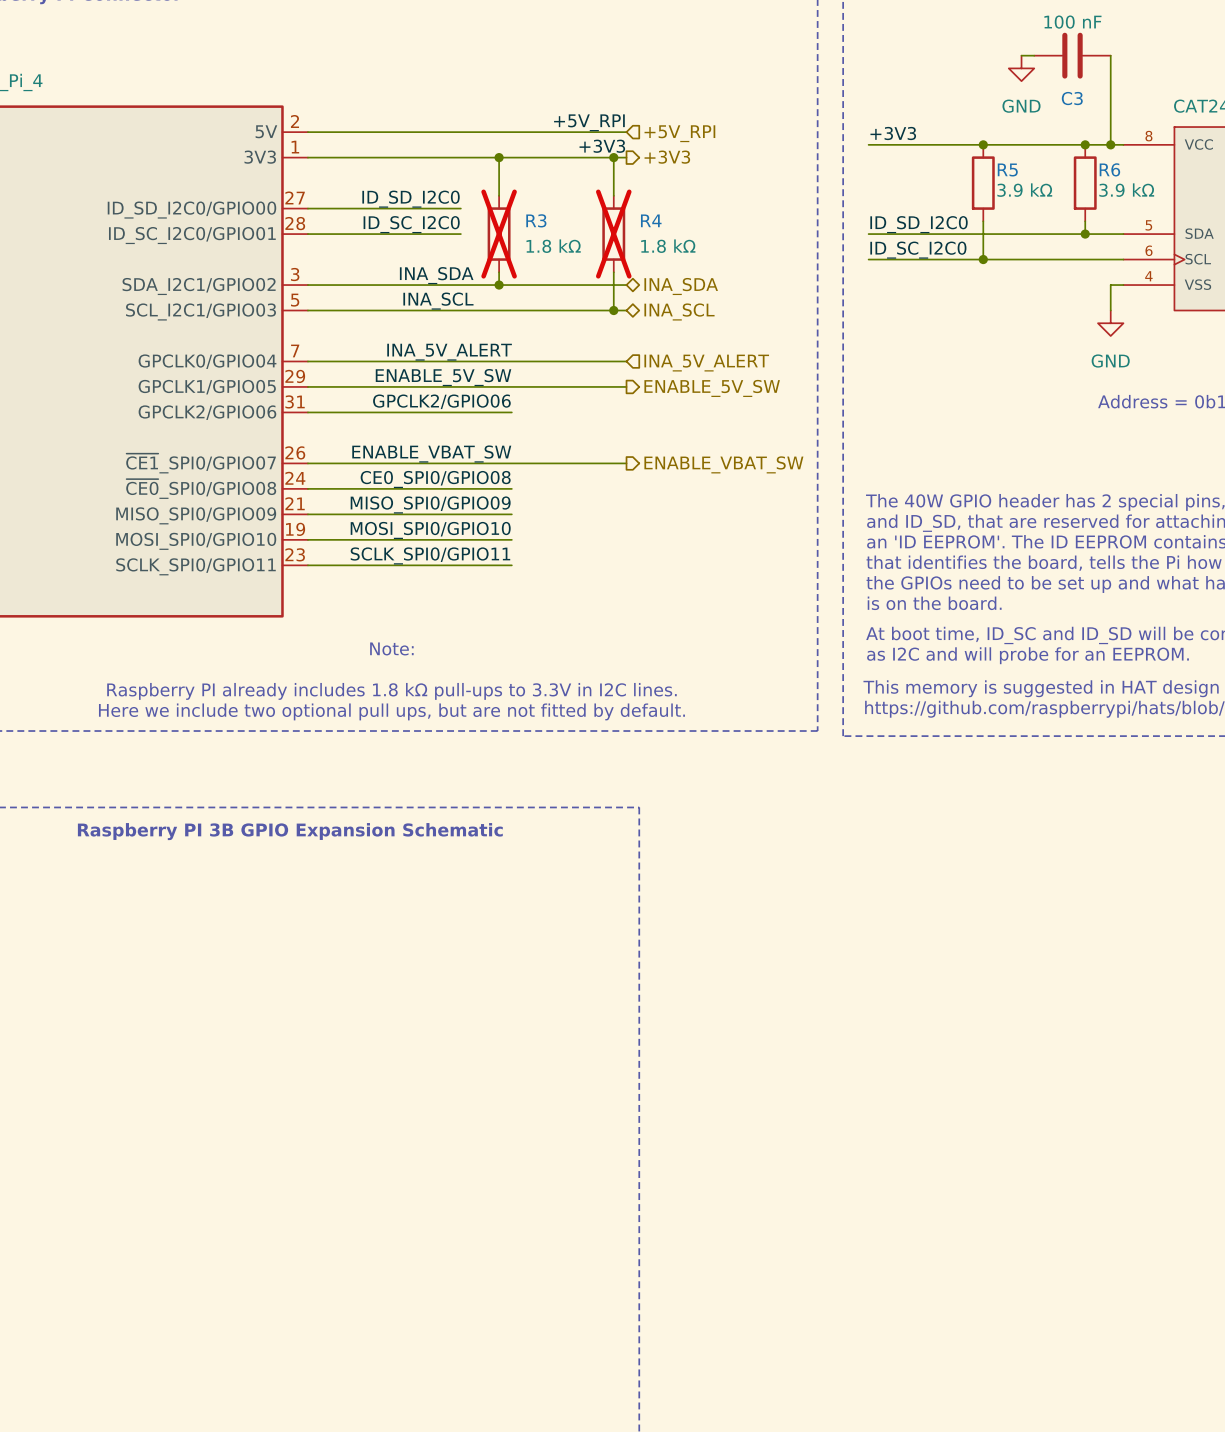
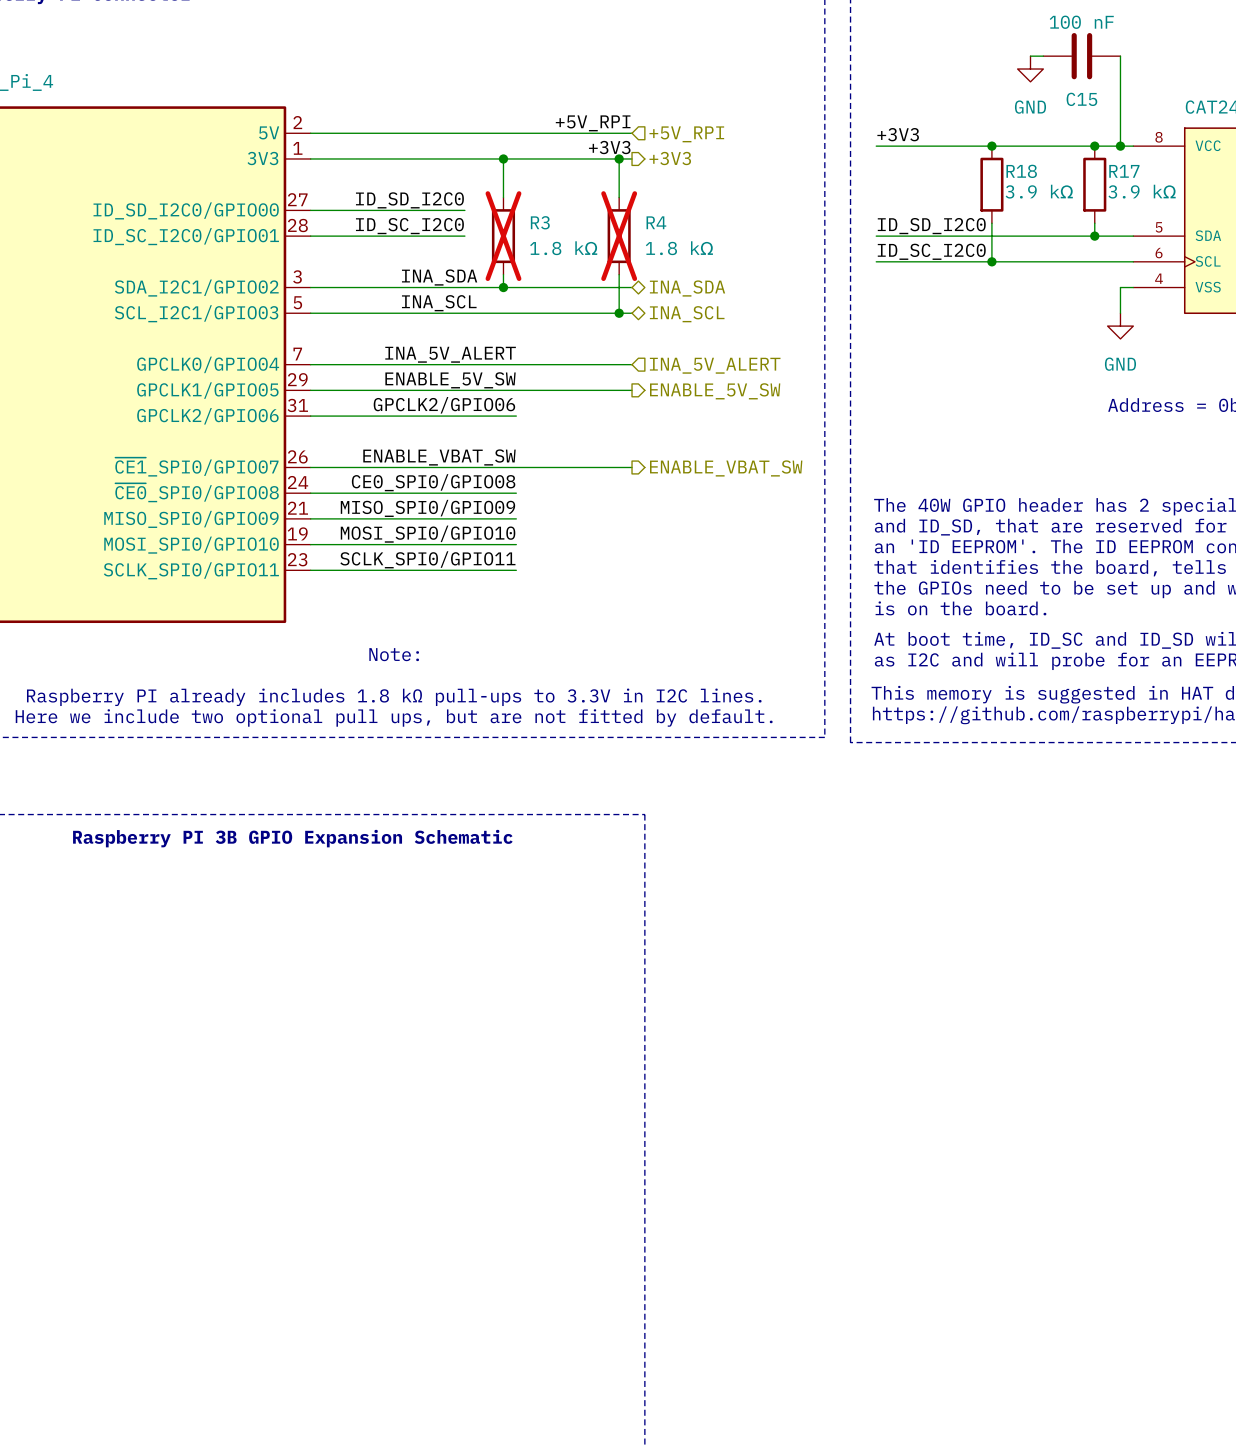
C3 name: C3 (1072, 98) -> C15 (1081, 99)
R5 name: R5 (1007, 169) -> R18 (1021, 171)
R6 name: R6 (1109, 169) -> R17 (1124, 171)

